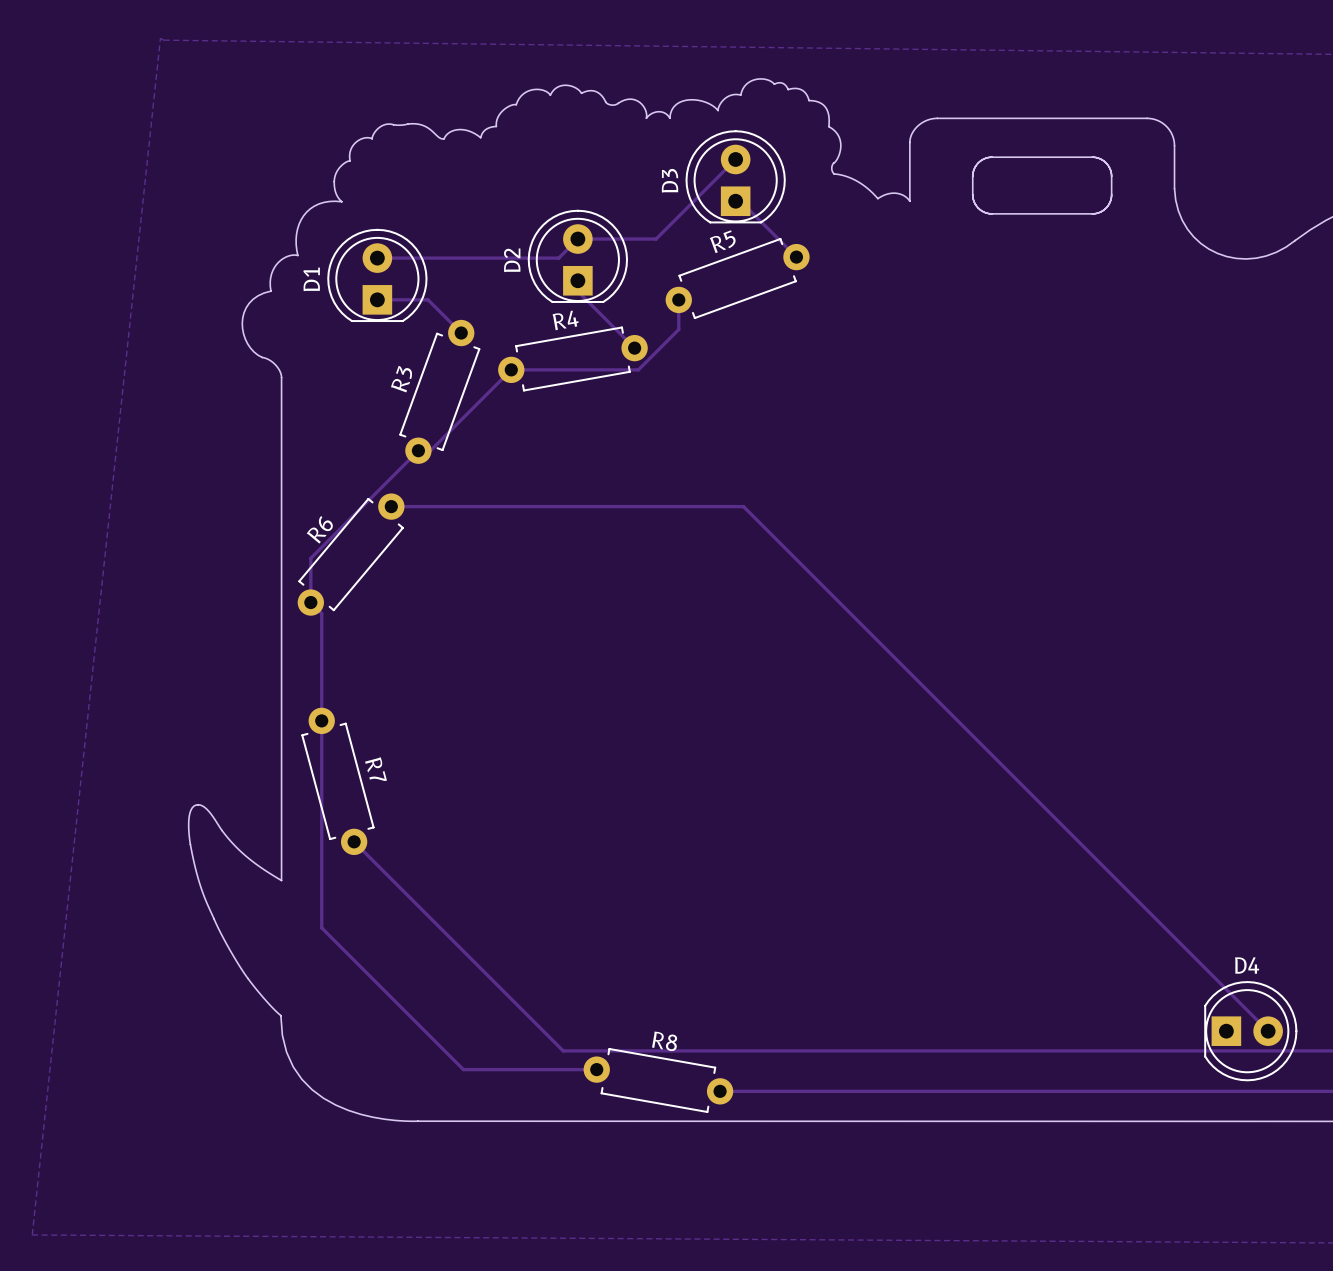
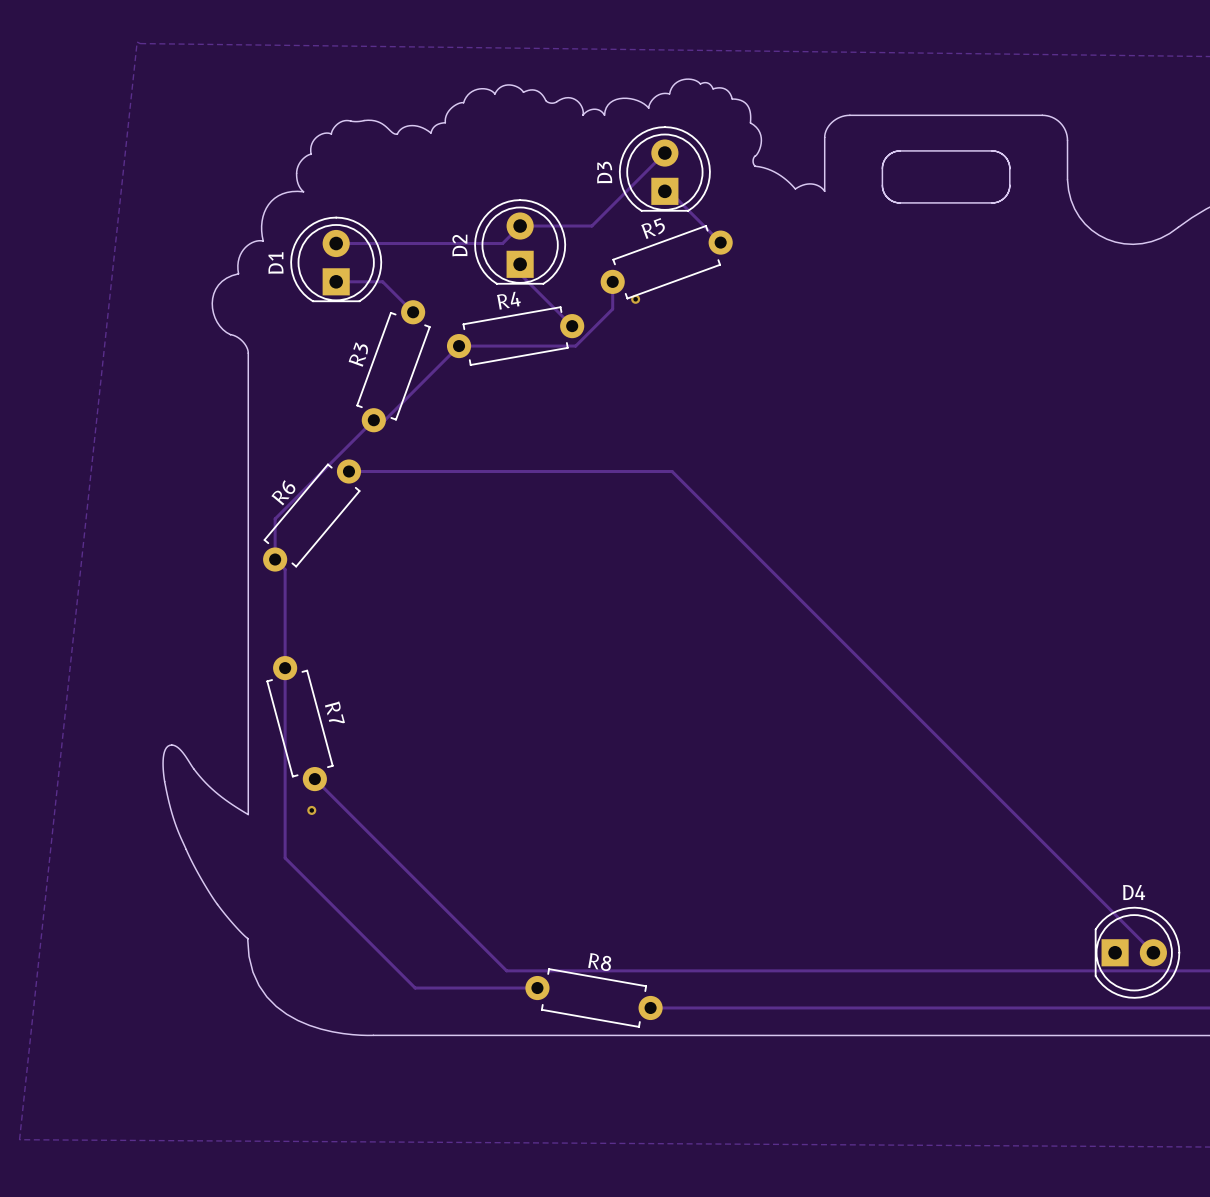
via: none -> (635, 299)
via: none -> (311, 810)

